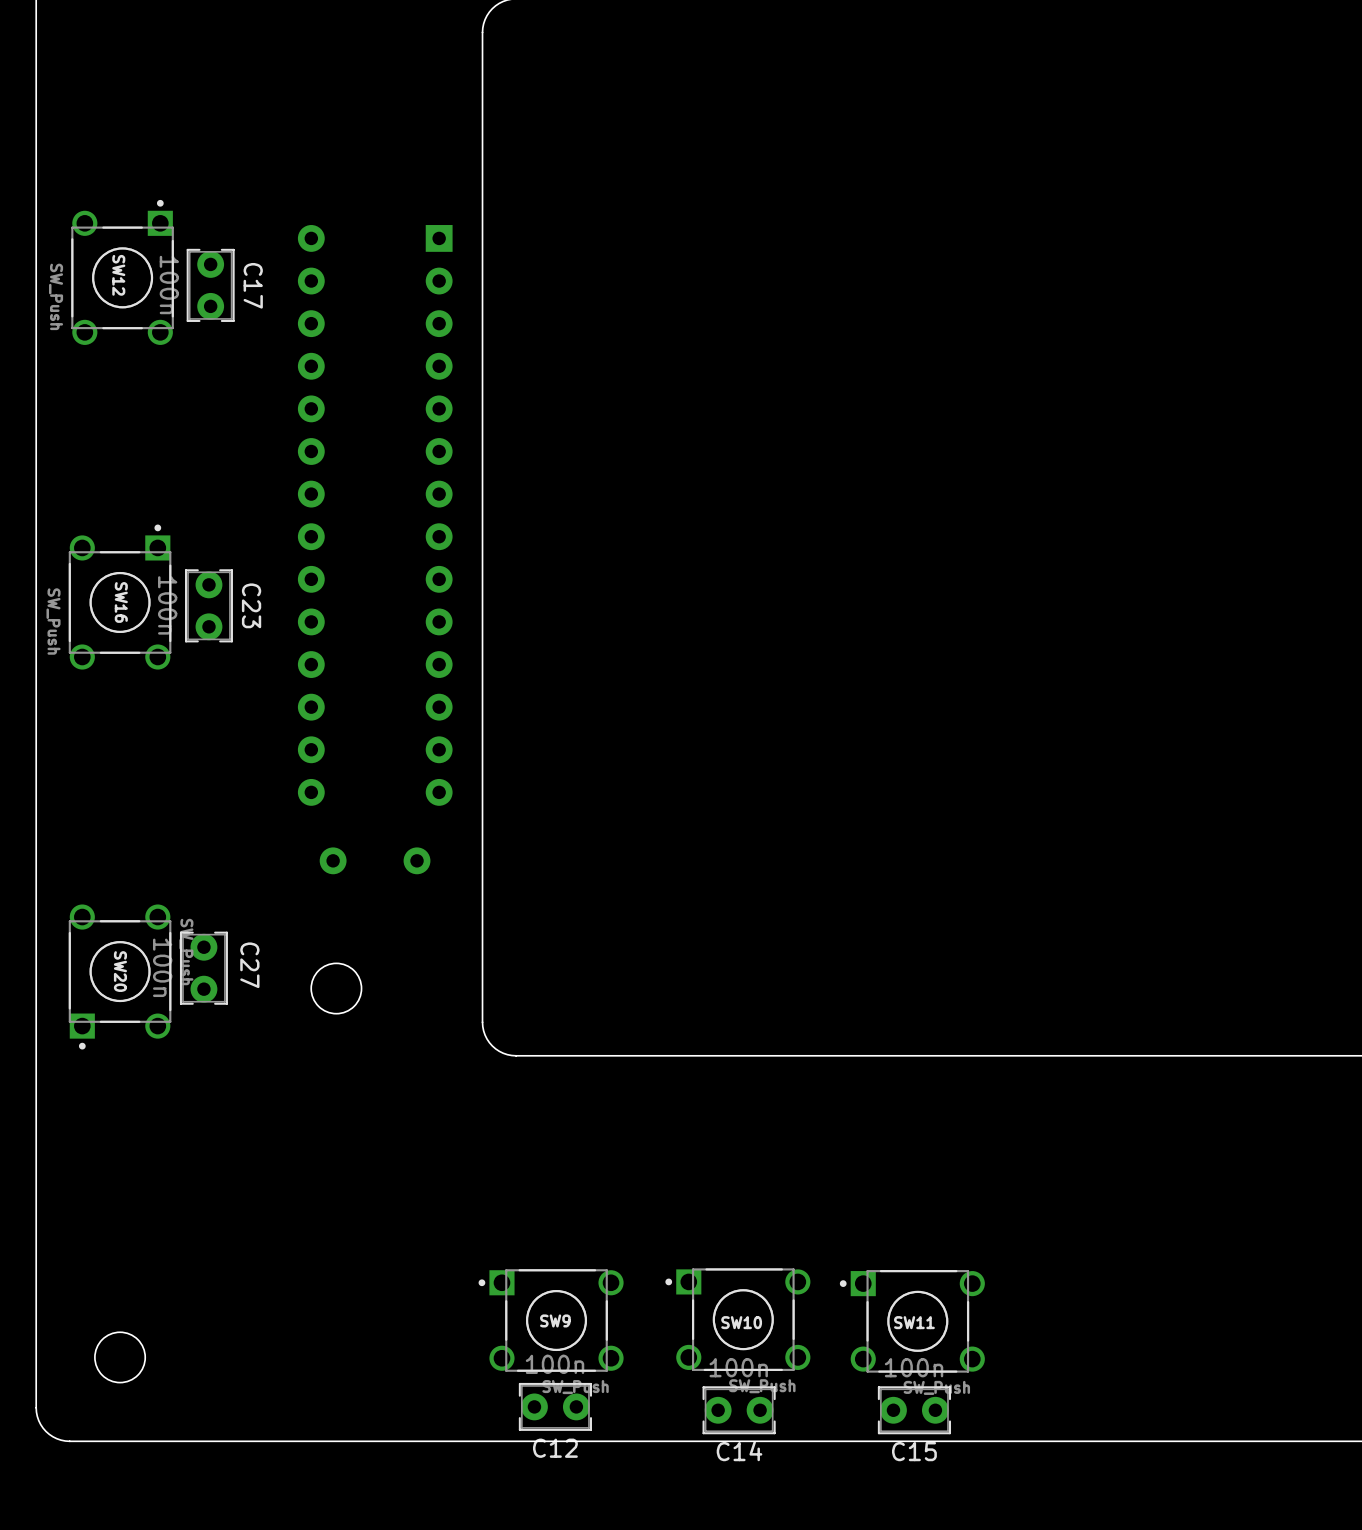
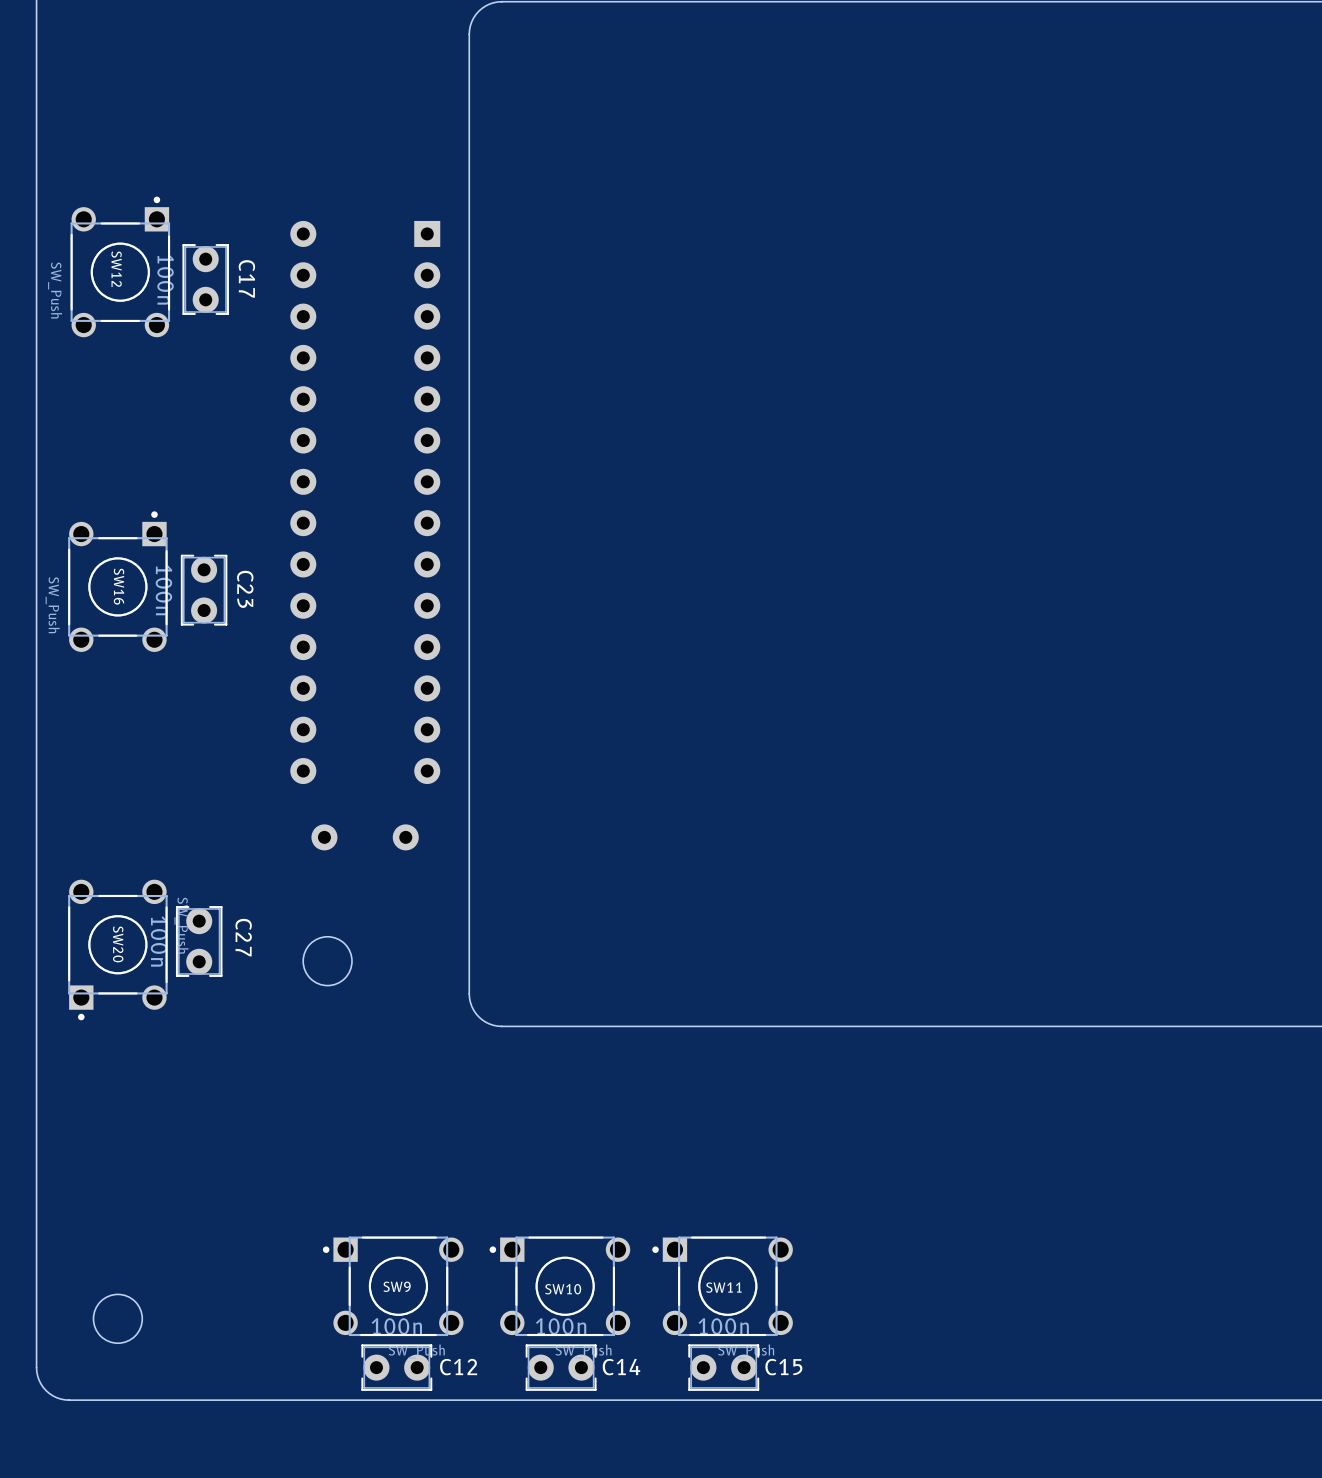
SW10 position: (737, 1319) -> (559, 1286)
SW9 position: (551, 1320) -> (393, 1286)
SW11 position: (912, 1321) -> (722, 1286)
C12 position: (555, 1406) -> (396, 1367)
C14 position: (739, 1410) -> (561, 1367)
C15 position: (914, 1410) -> (723, 1367)
C12 name position: C12 (555, 1448) -> C12 (458, 1367)
C14 name position: C14 (739, 1451) -> C14 (621, 1367)
C15 name position: C15 (914, 1451) -> C15 (783, 1367)

